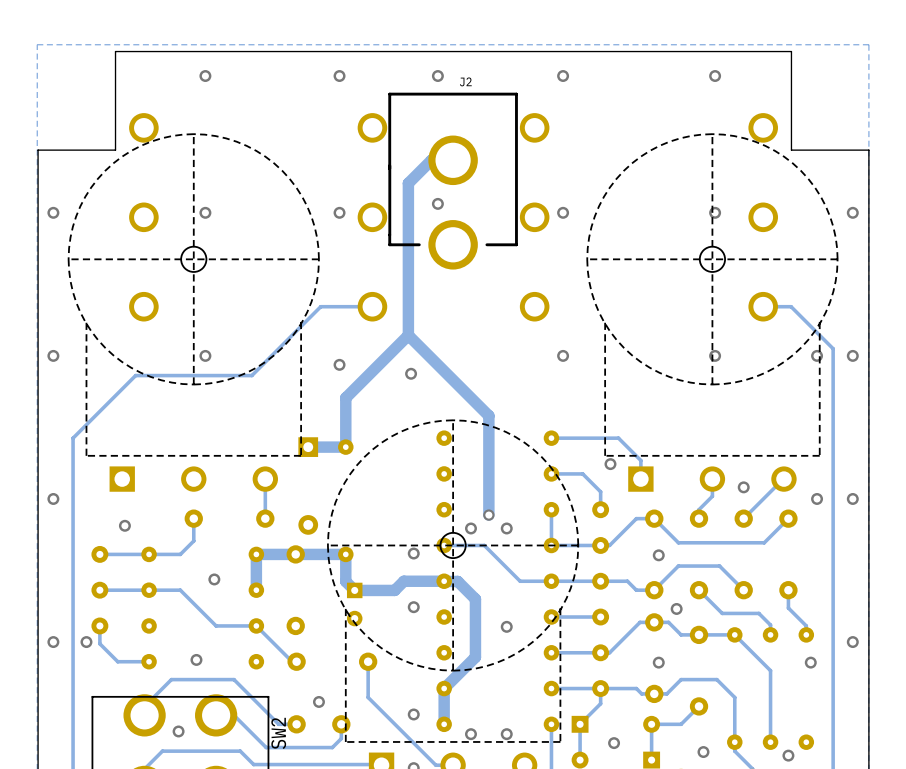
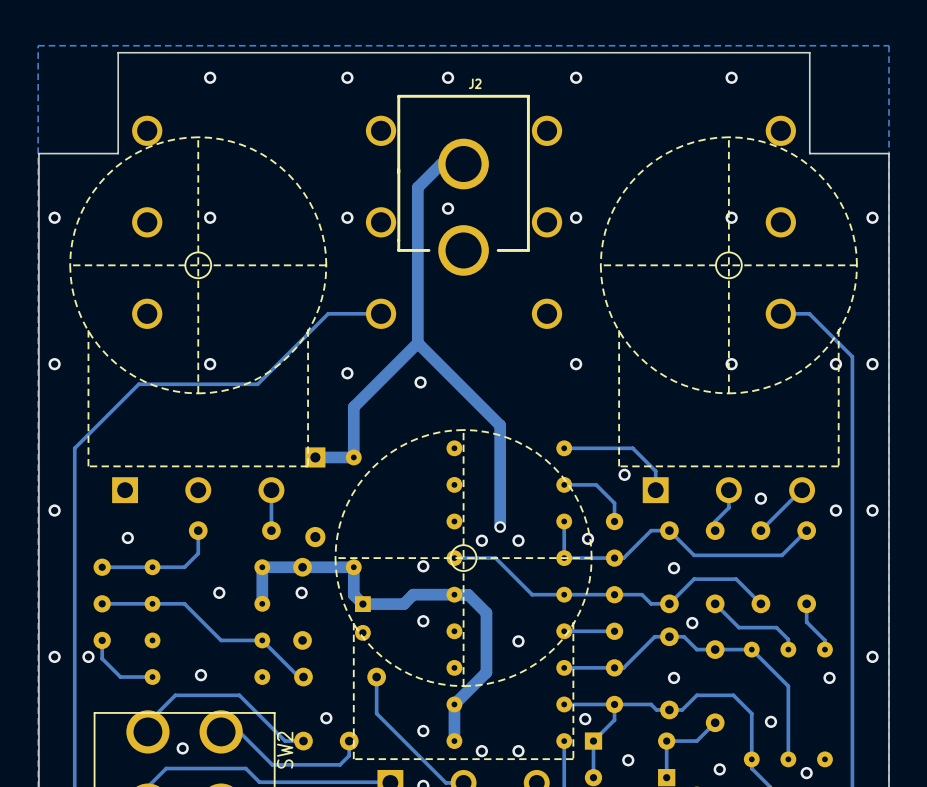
via: none -> (588, 538)
via: none -> (301, 592)
via: none -> (585, 719)
via: none -> (770, 721)

